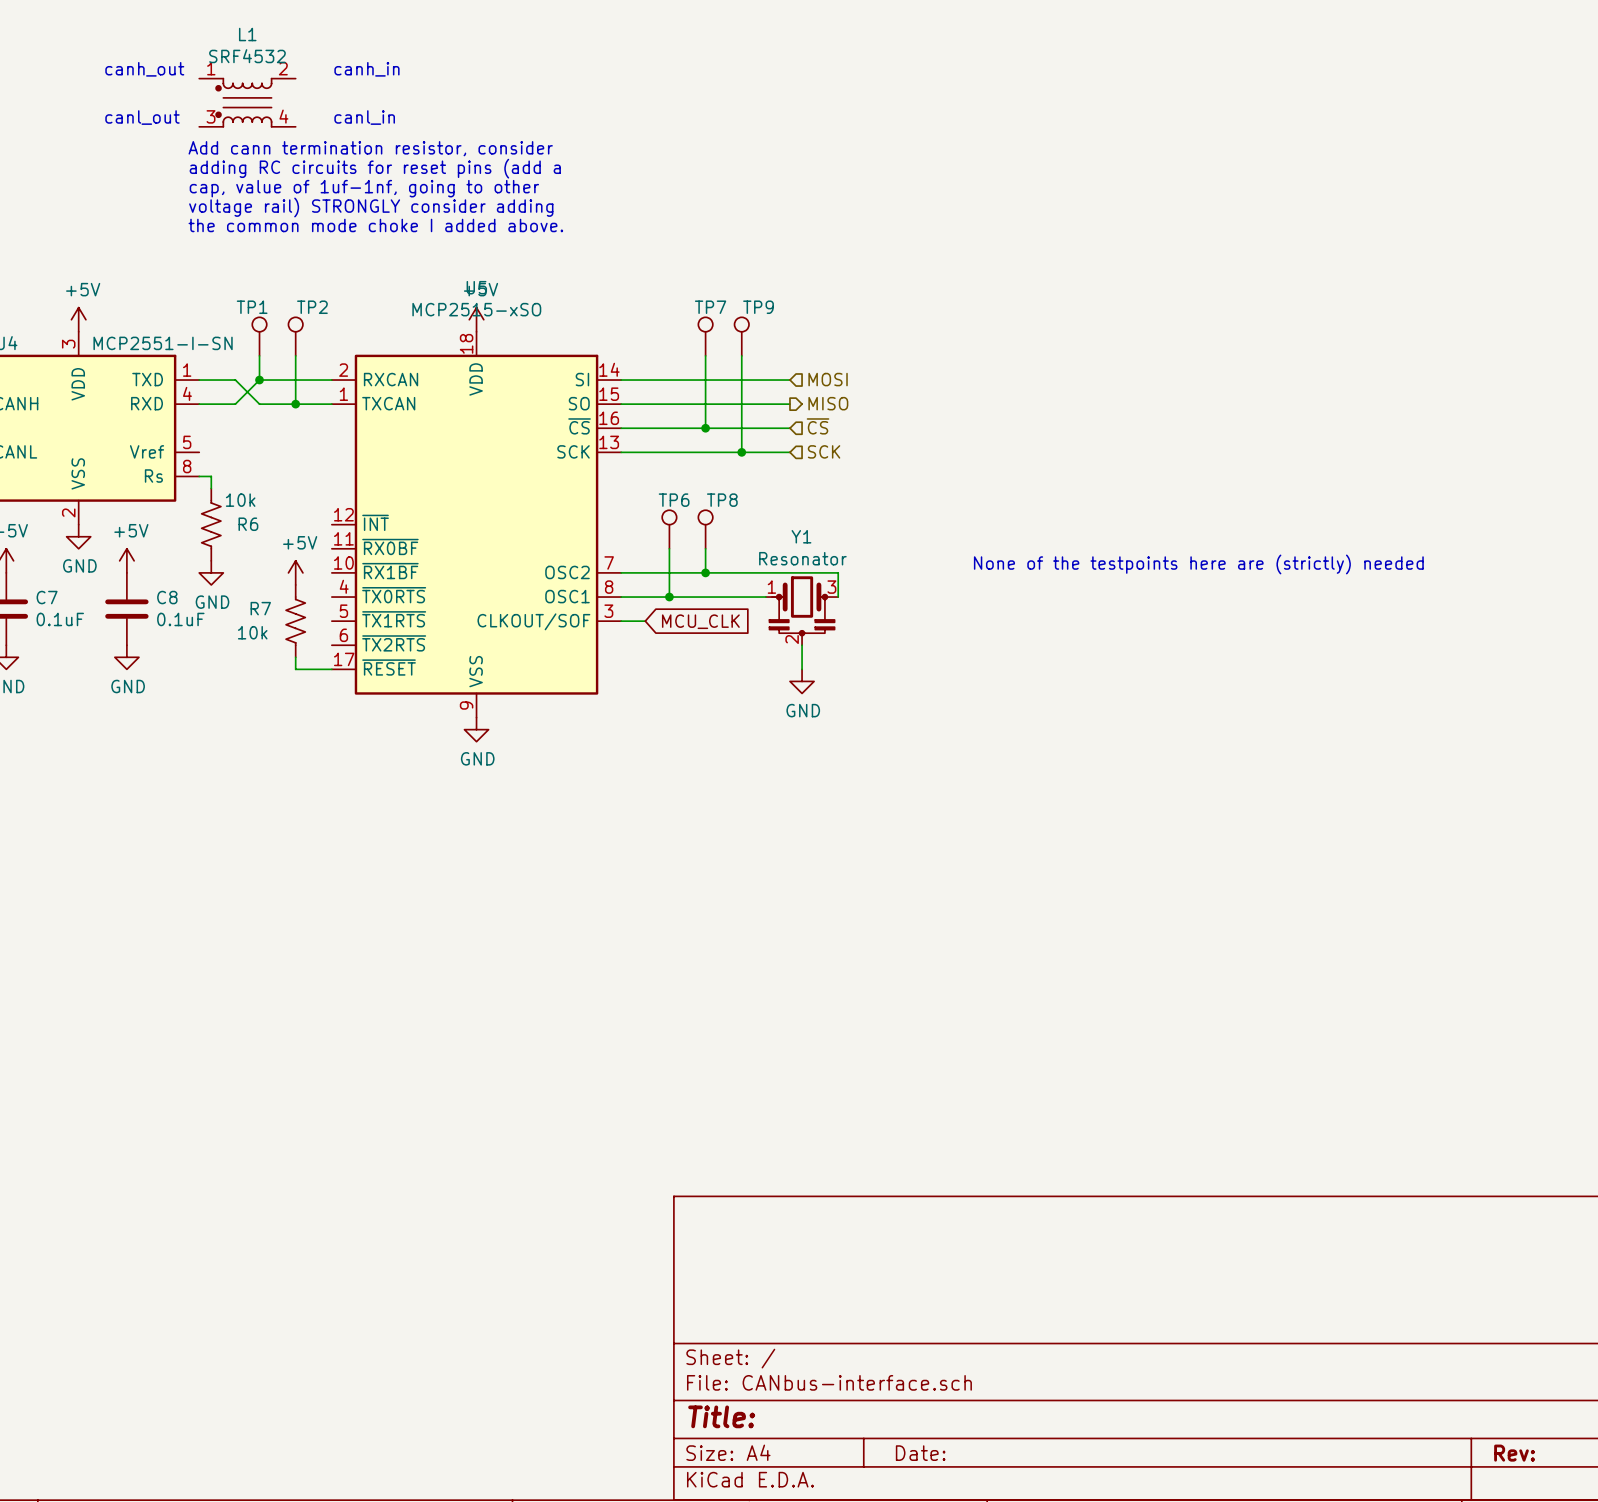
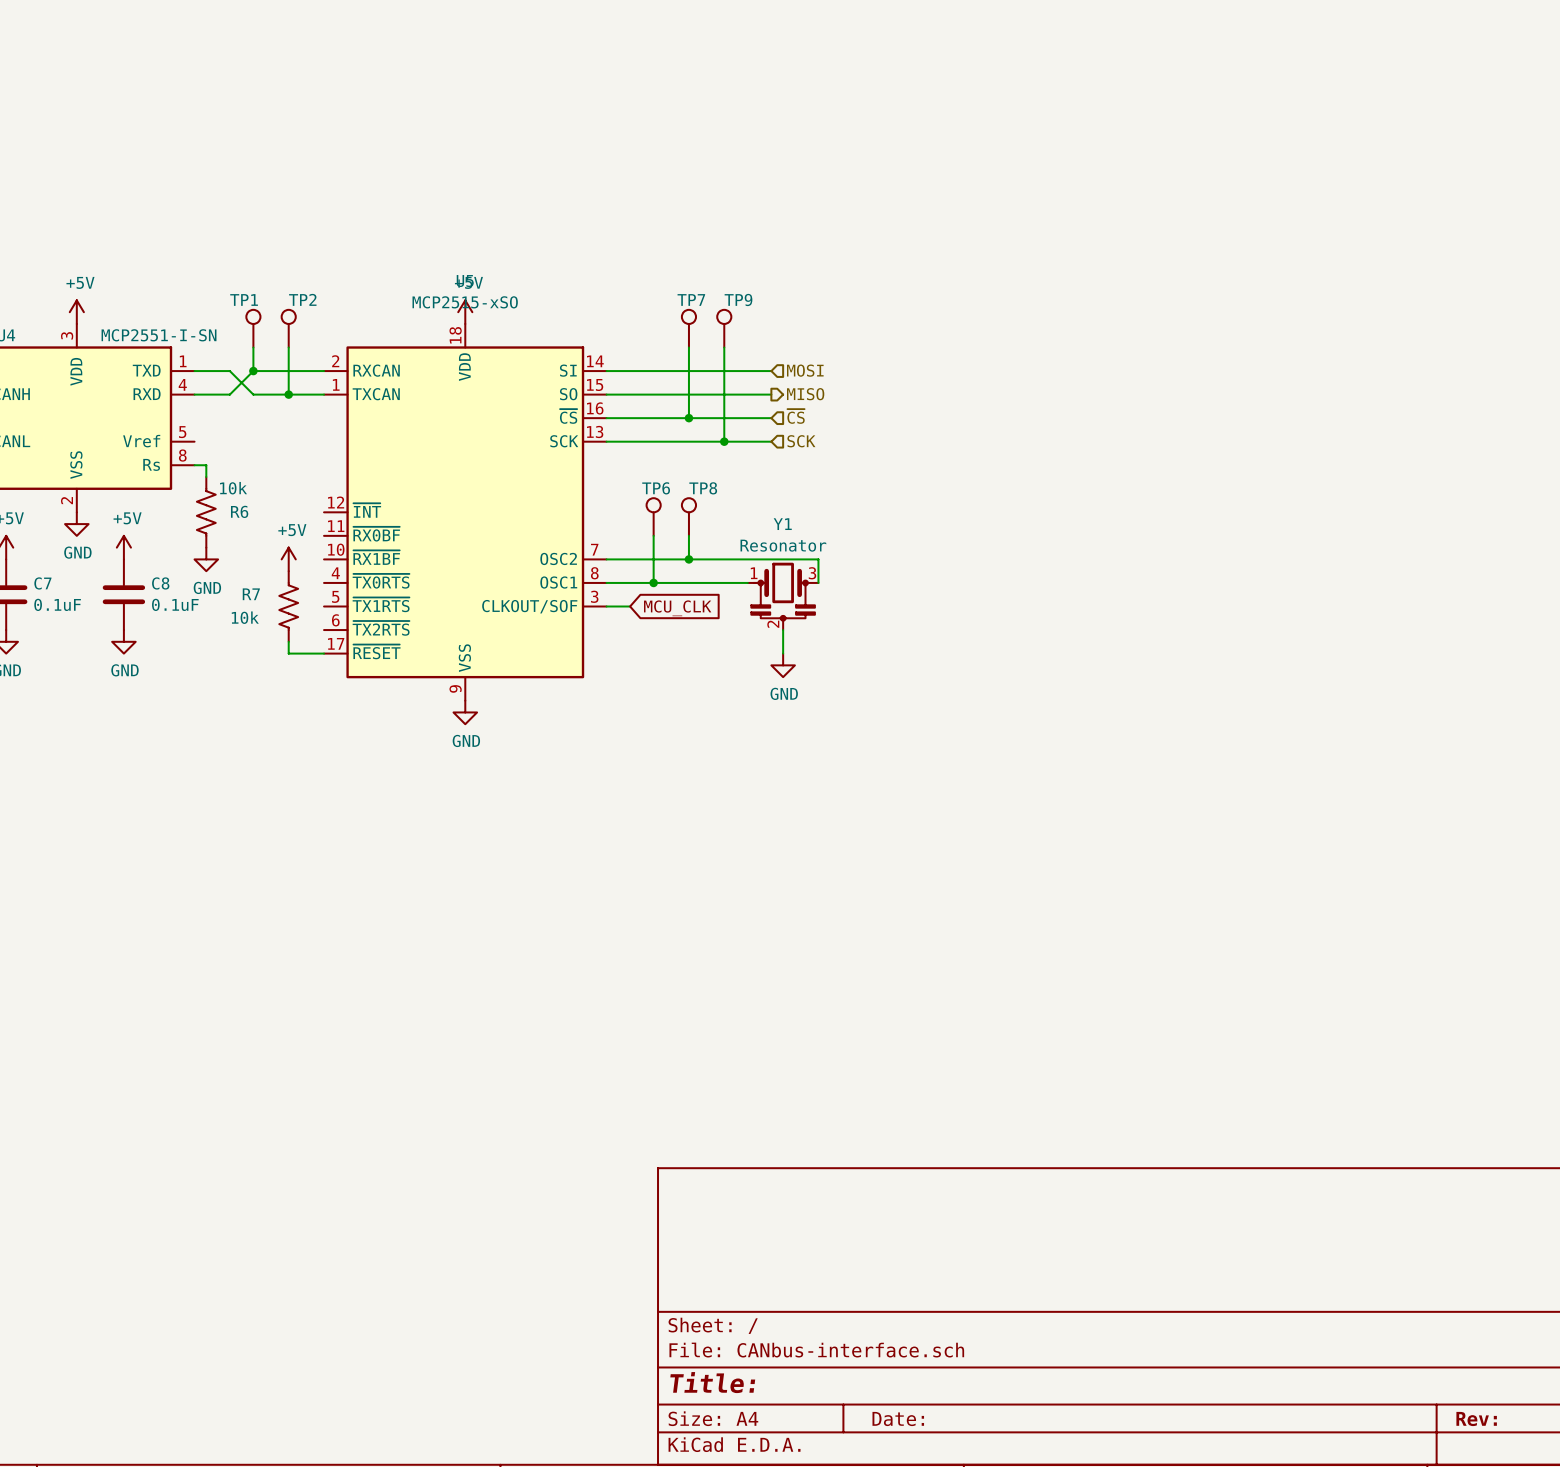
text: canh_out (144, 69) -> none
text: canh_in (366, 69) -> none
L1: SRF4532 (247, 102) -> none
text: canl_out (142, 117) -> none
text: canl_in (364, 117) -> none
text: Add cann termination resistor, consider (370, 148) -> none
text: adding RC circuits for reset pins (add a (375, 168) -> none
text: cap, value of 1uf-1nf, going to other (364, 188) -> none
text: voltage rail) STRONGLY consider adding (371, 207) -> none
text: the common mode choke I added above. (375, 225) -> none
text: None of the testpoints here are (strictly) needed (1198, 564) -> none

